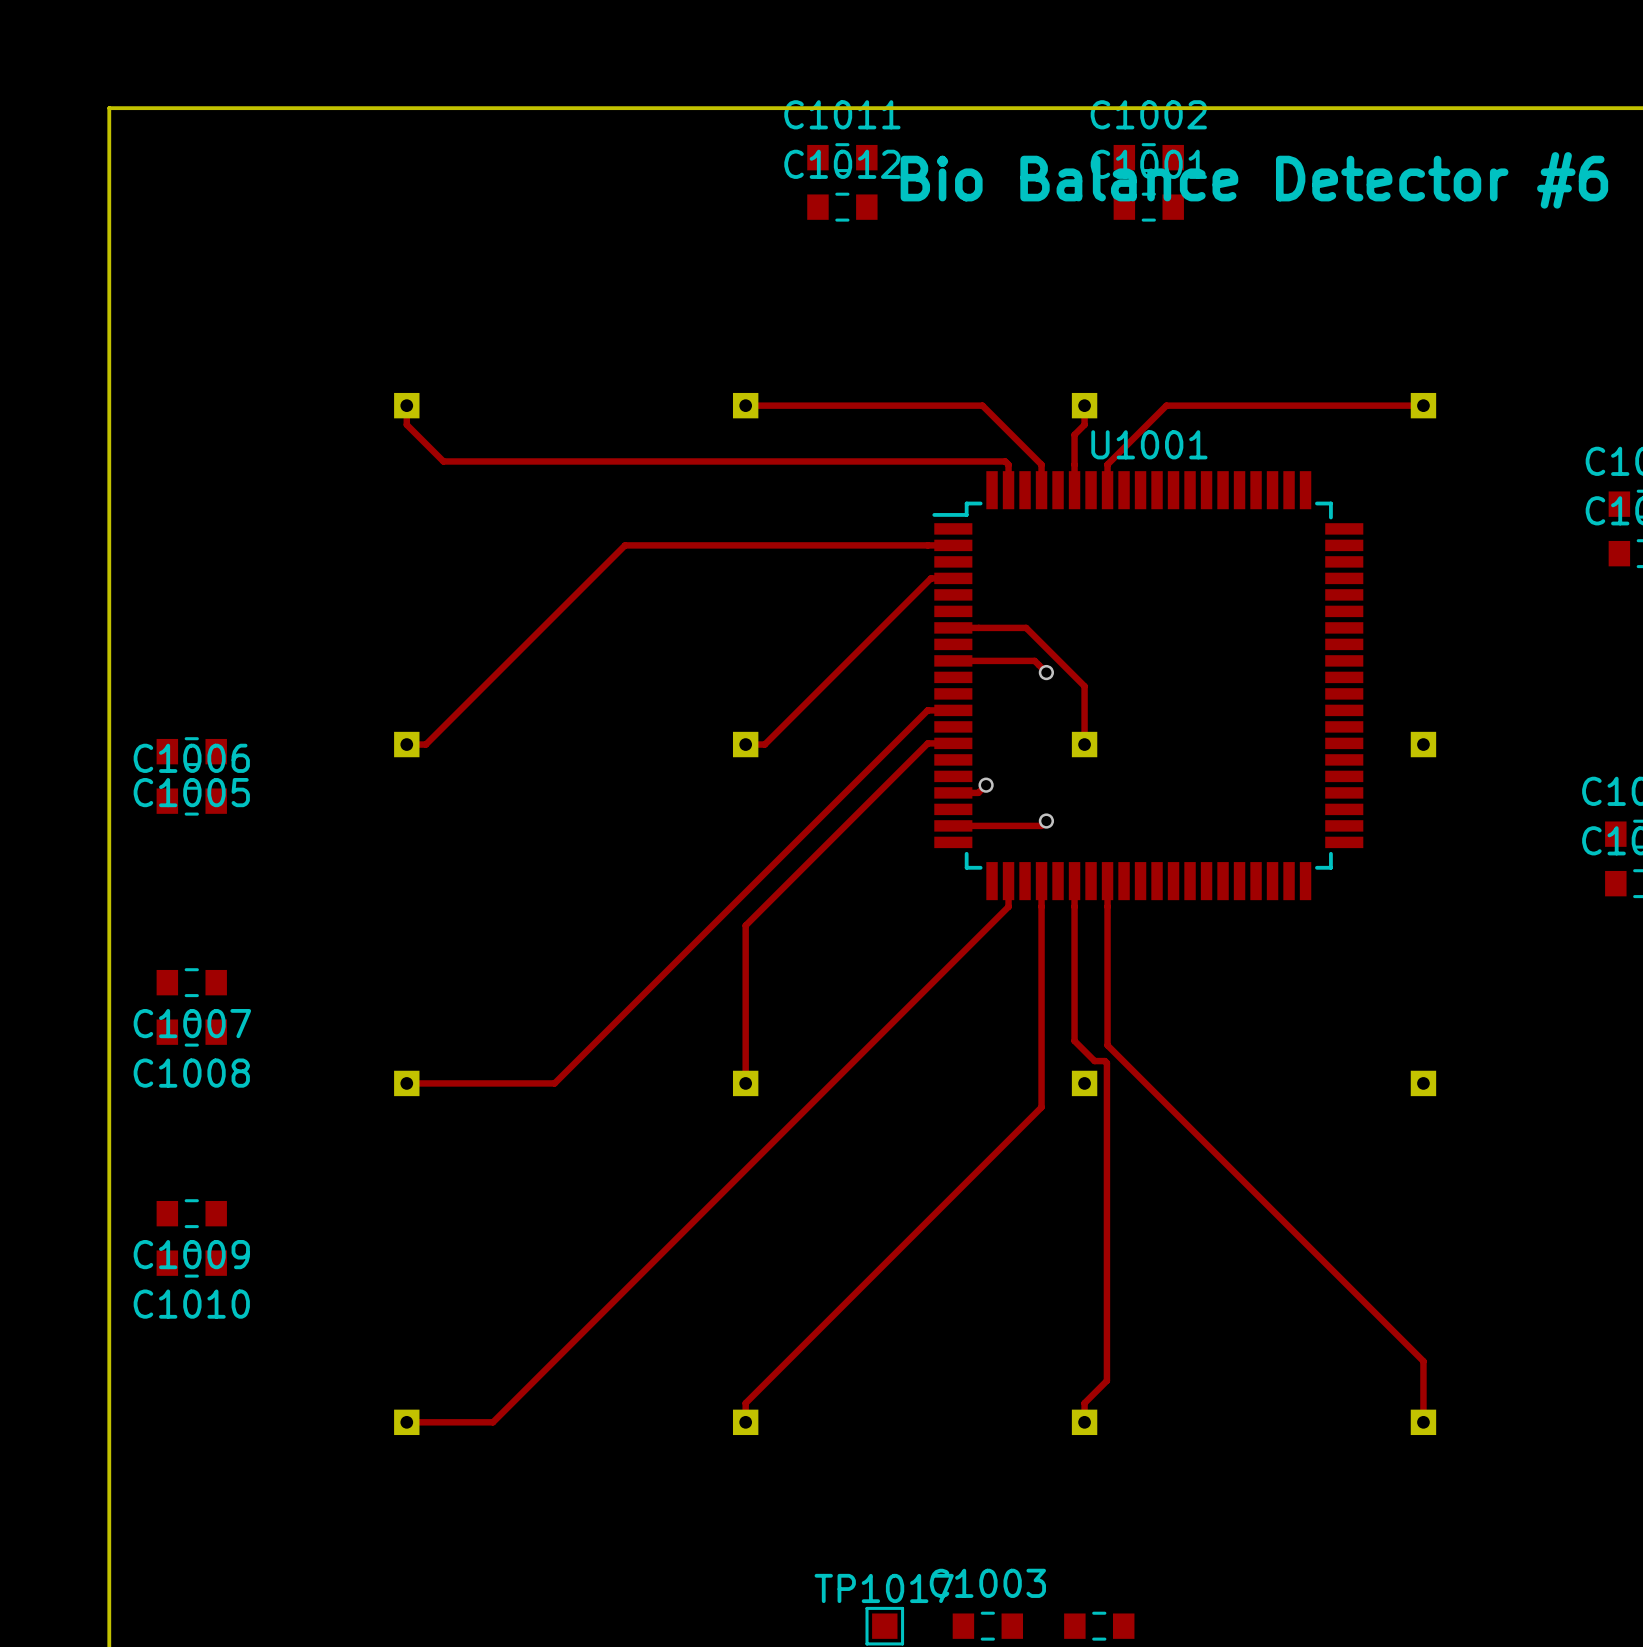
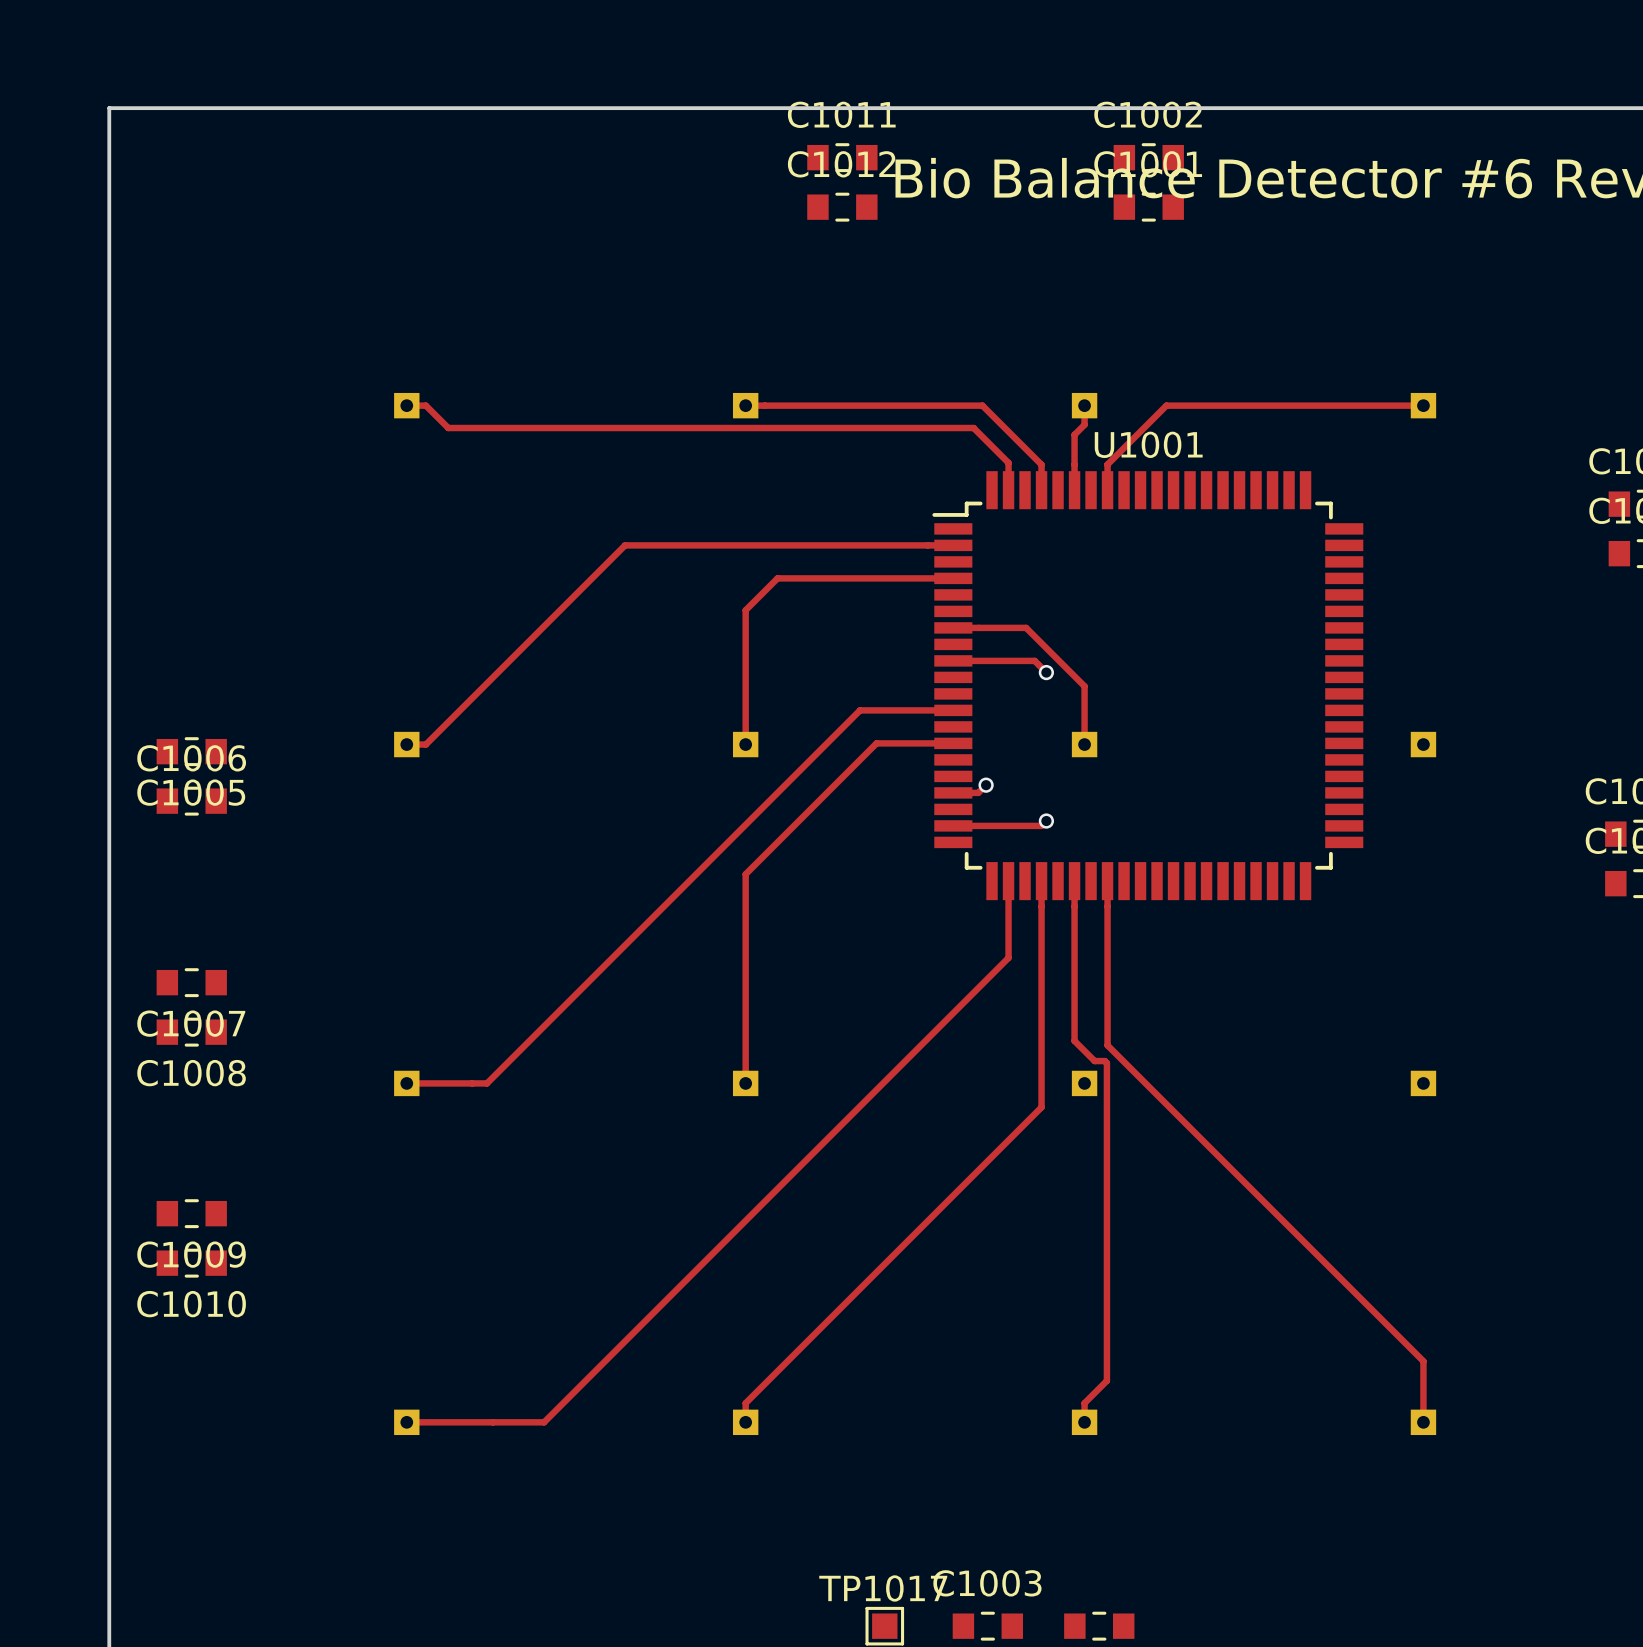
track: (406, 405) (406, 424) (443, 461) (1005, 461) (1008, 464) -> (406, 405) (425, 405) (448, 428) (973, 428) (1008, 464)
track: (930, 578) (764, 744) (745, 744) -> (930, 578) (777, 578) (745, 610) (745, 744)
track: (927, 710) (554, 1083) (487, 1083) -> (927, 710) (860, 710) (487, 1083)
track: (927, 743) (745, 925) -> (927, 743) (876, 743) (745, 874) (745, 925)
track: (1008, 906) (492, 1422) -> (1008, 906) (1008, 957) (544, 1422) (492, 1422)

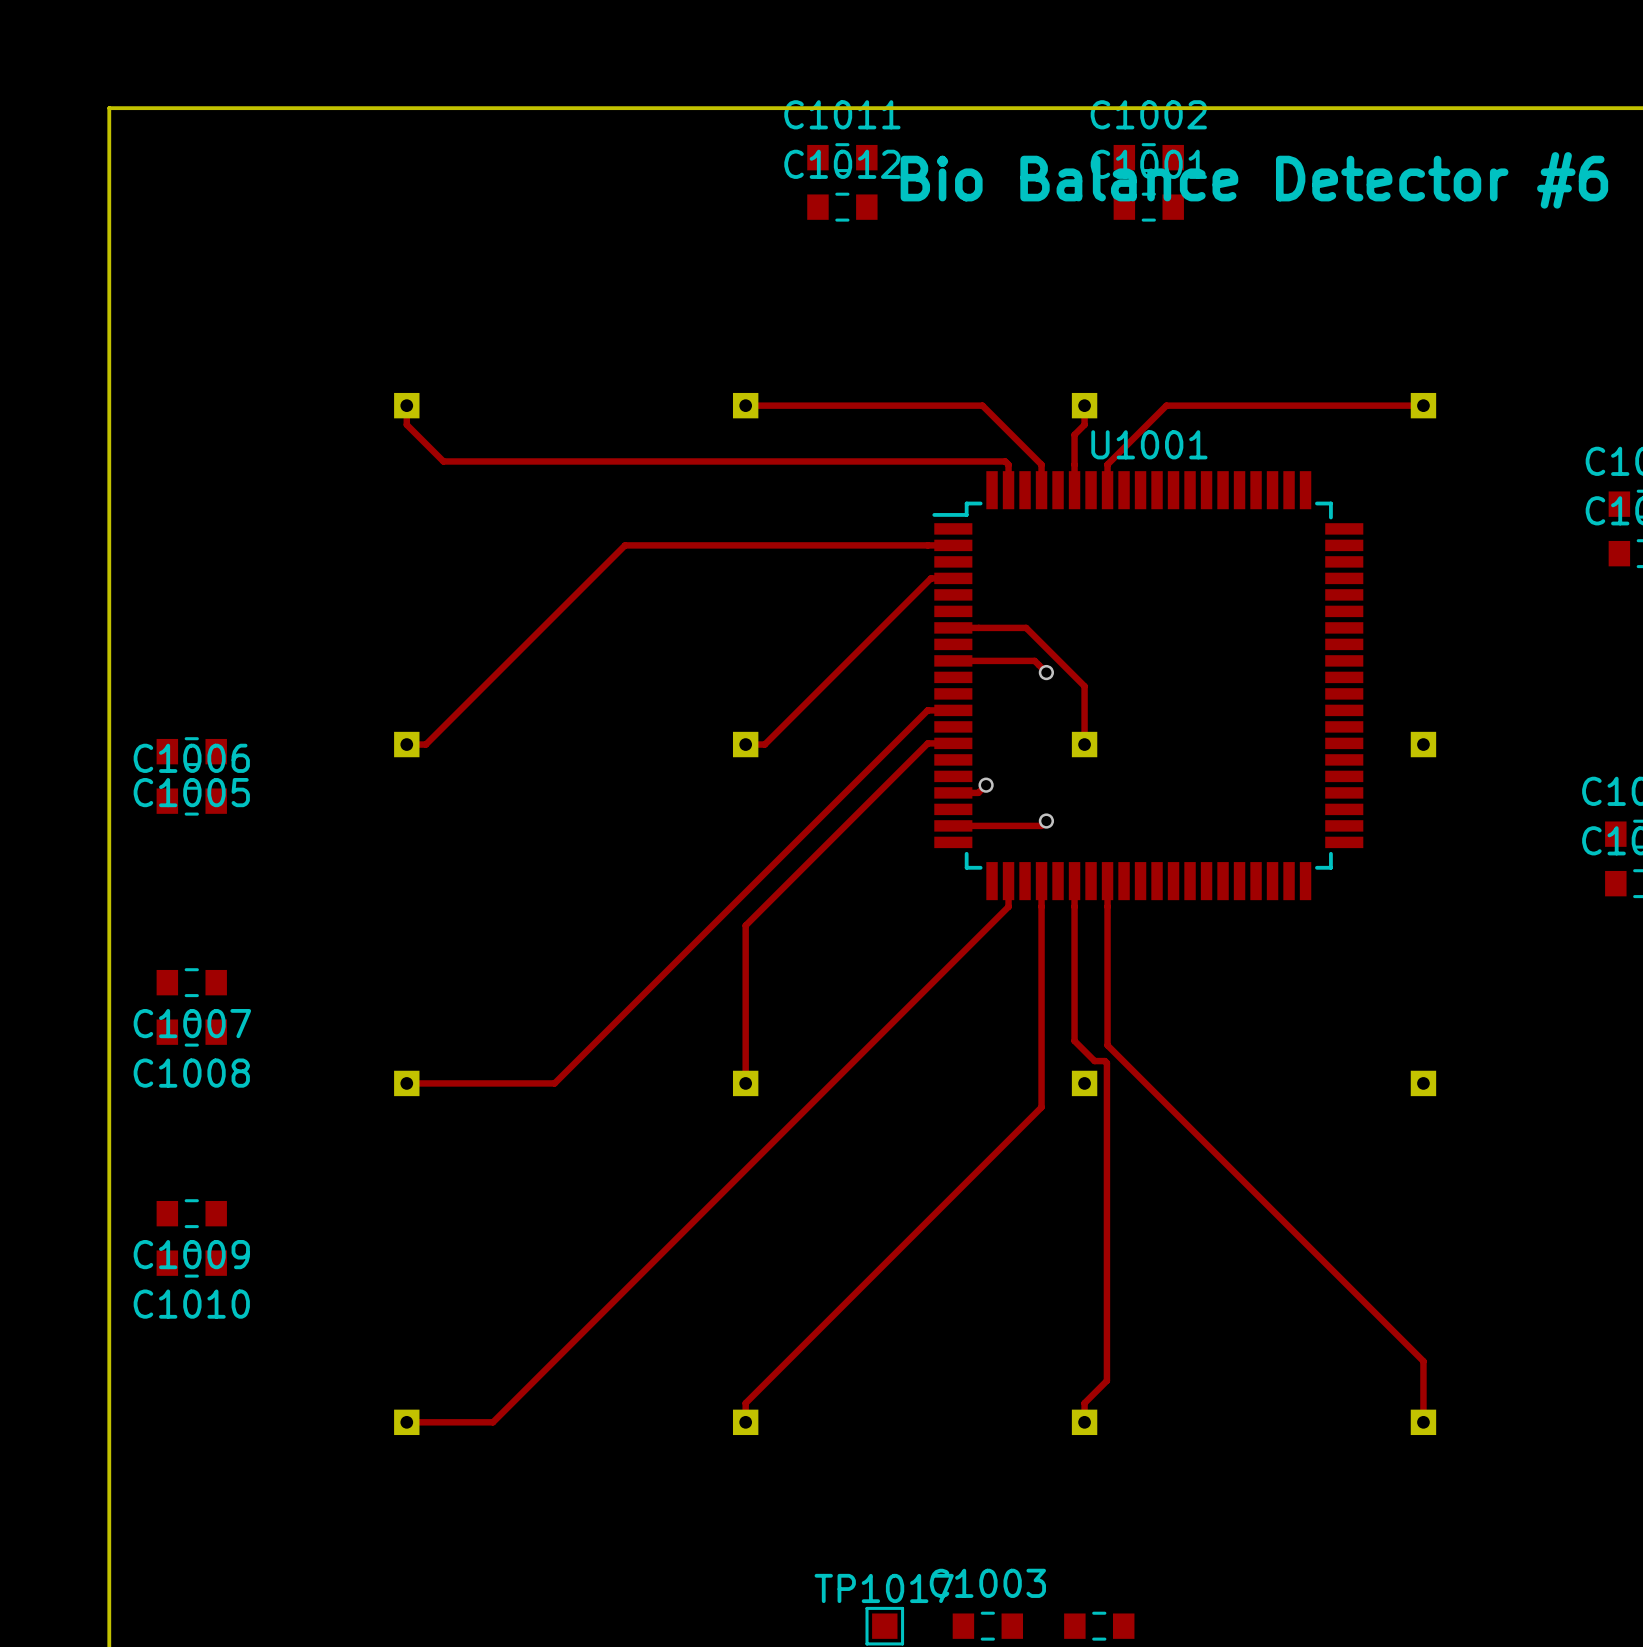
track: (406, 405) (425, 405) (448, 428) (973, 428) (1008, 464) -> (406, 405) (406, 424) (443, 461) (1005, 461) (1008, 464)
track: (930, 578) (777, 578) (745, 610) (745, 744) -> (930, 578) (764, 744) (745, 744)
track: (927, 710) (860, 710) (487, 1083) -> (927, 710) (554, 1083) (487, 1083)
track: (927, 743) (876, 743) (745, 874) (745, 925) -> (927, 743) (745, 925)
track: (1008, 906) (1008, 957) (544, 1422) (492, 1422) -> (1008, 906) (492, 1422)

